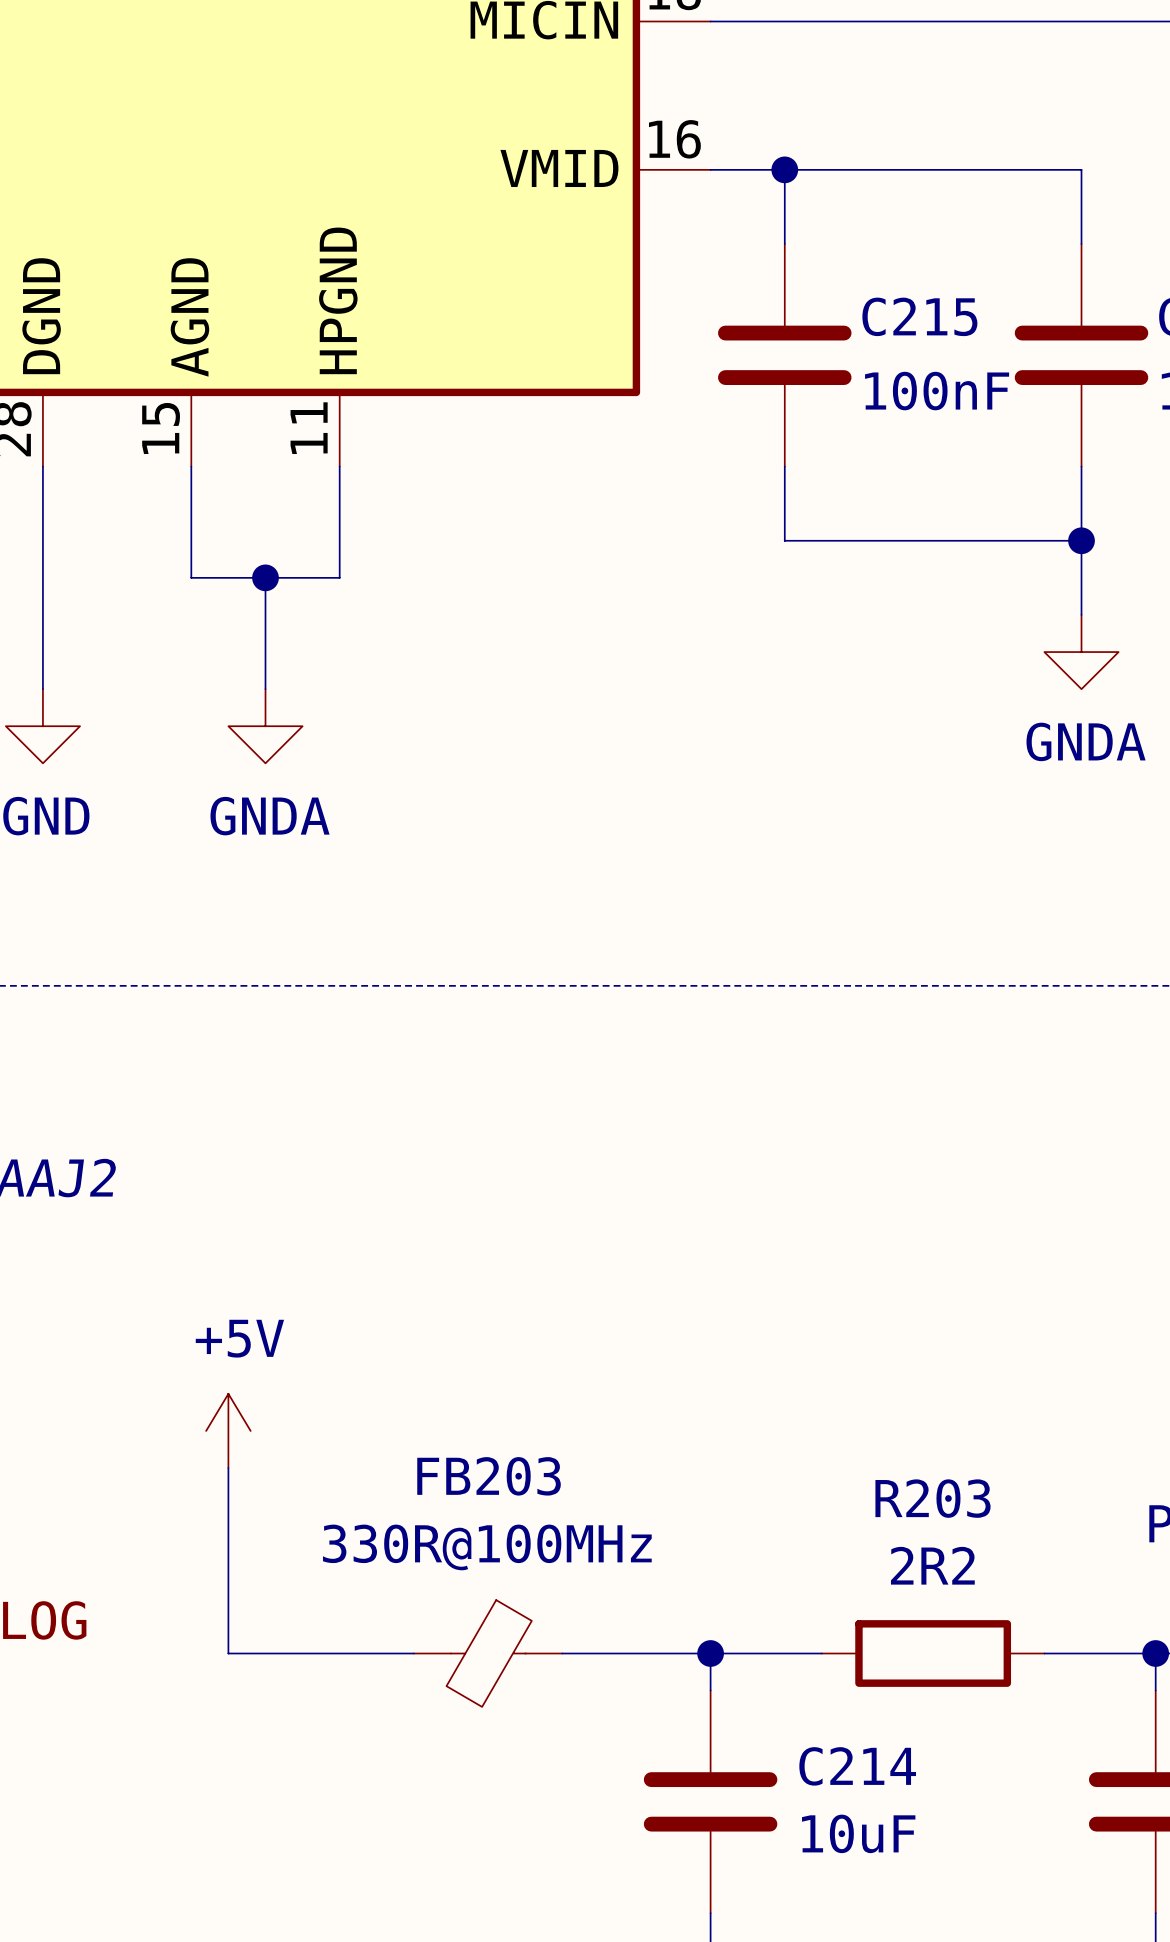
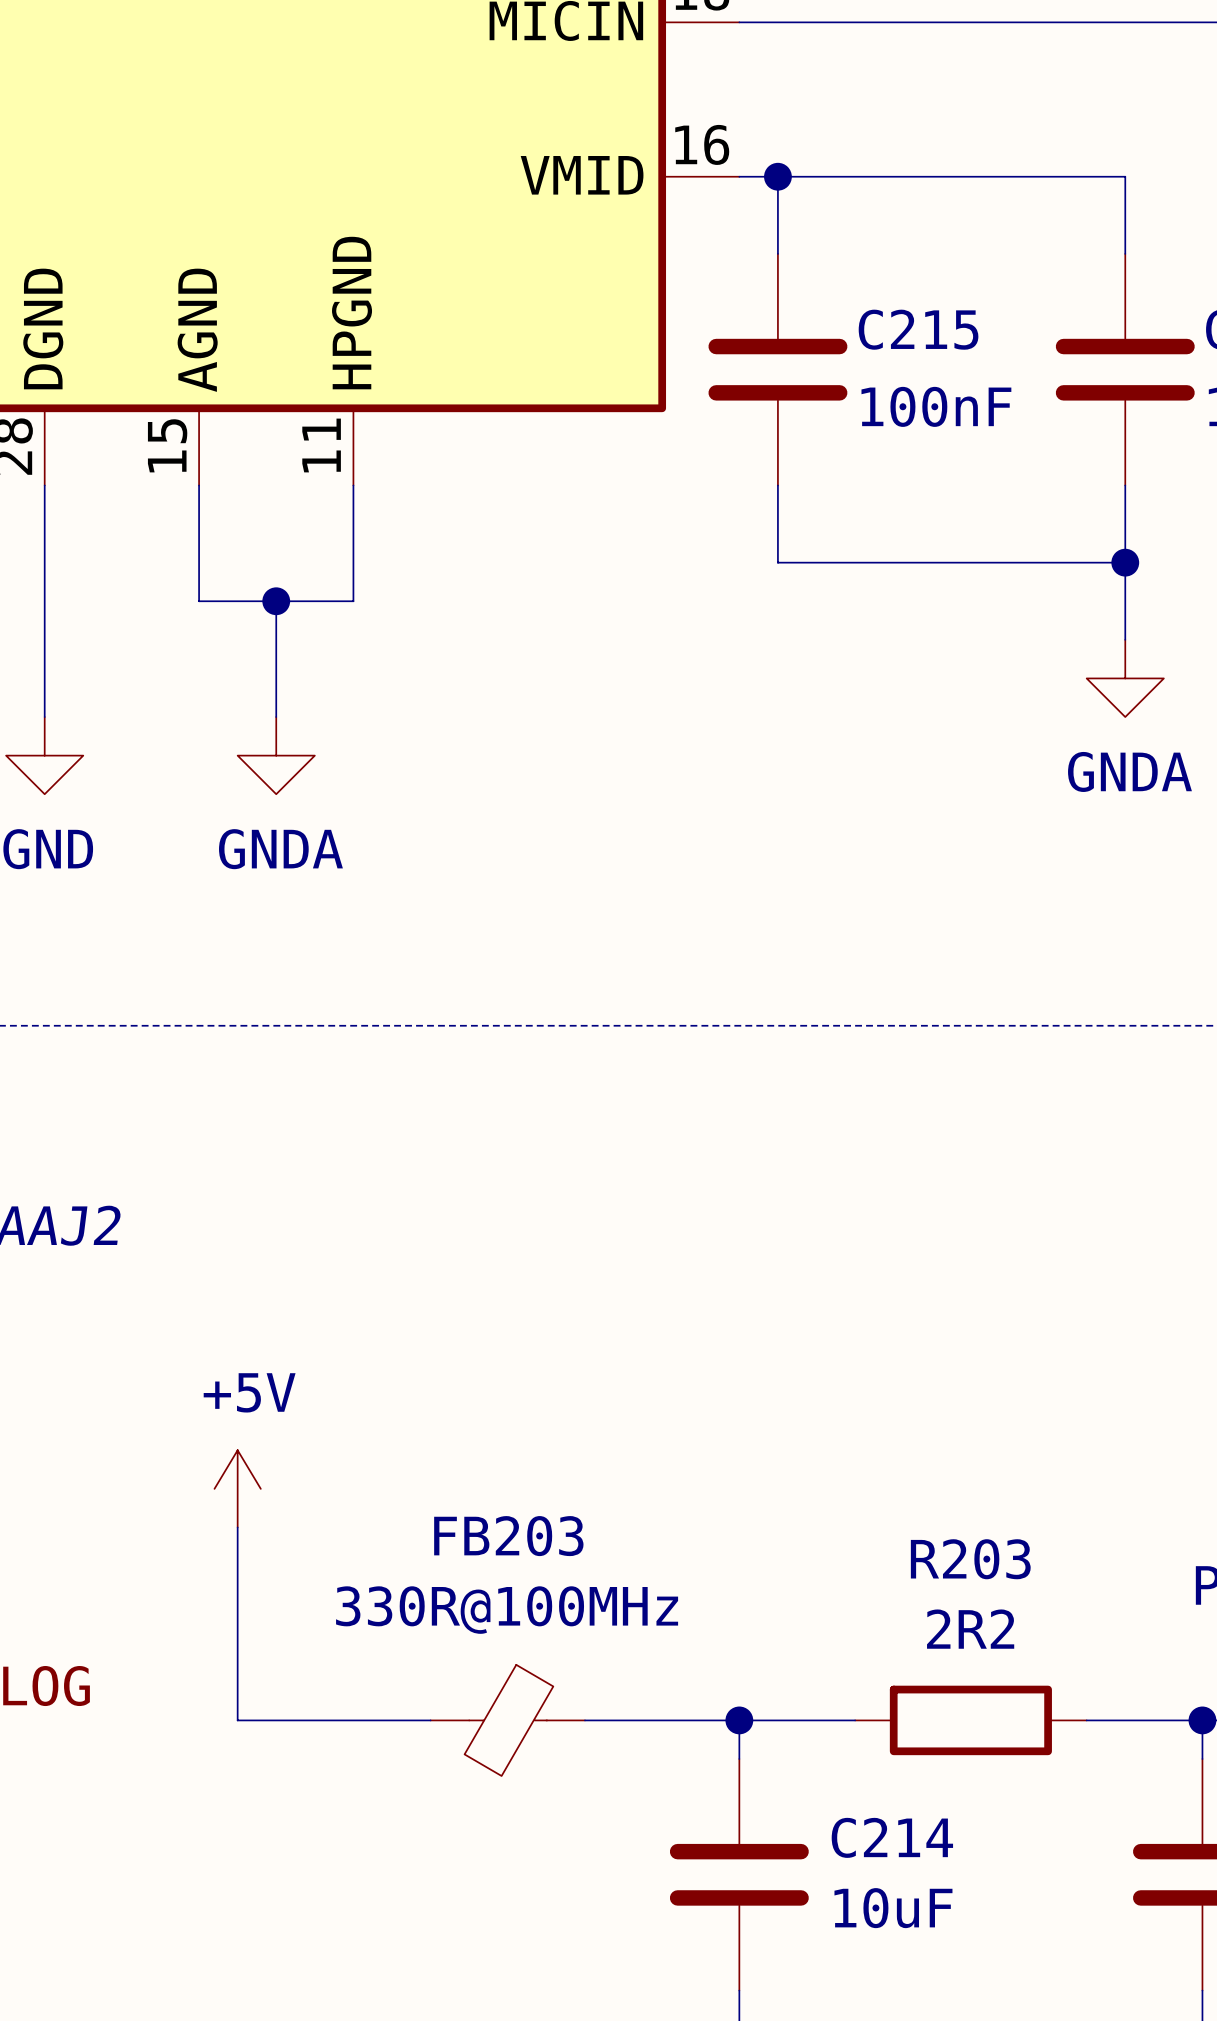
wire: (784, 169) (784, 244) -> (777, 176) (777, 253)
junction position: (784, 169) -> (777, 176)
C215 position: (784, 355) -> (777, 369)
wire: (784, 466) (784, 540) -> (777, 485) (777, 562) (816, 562)

